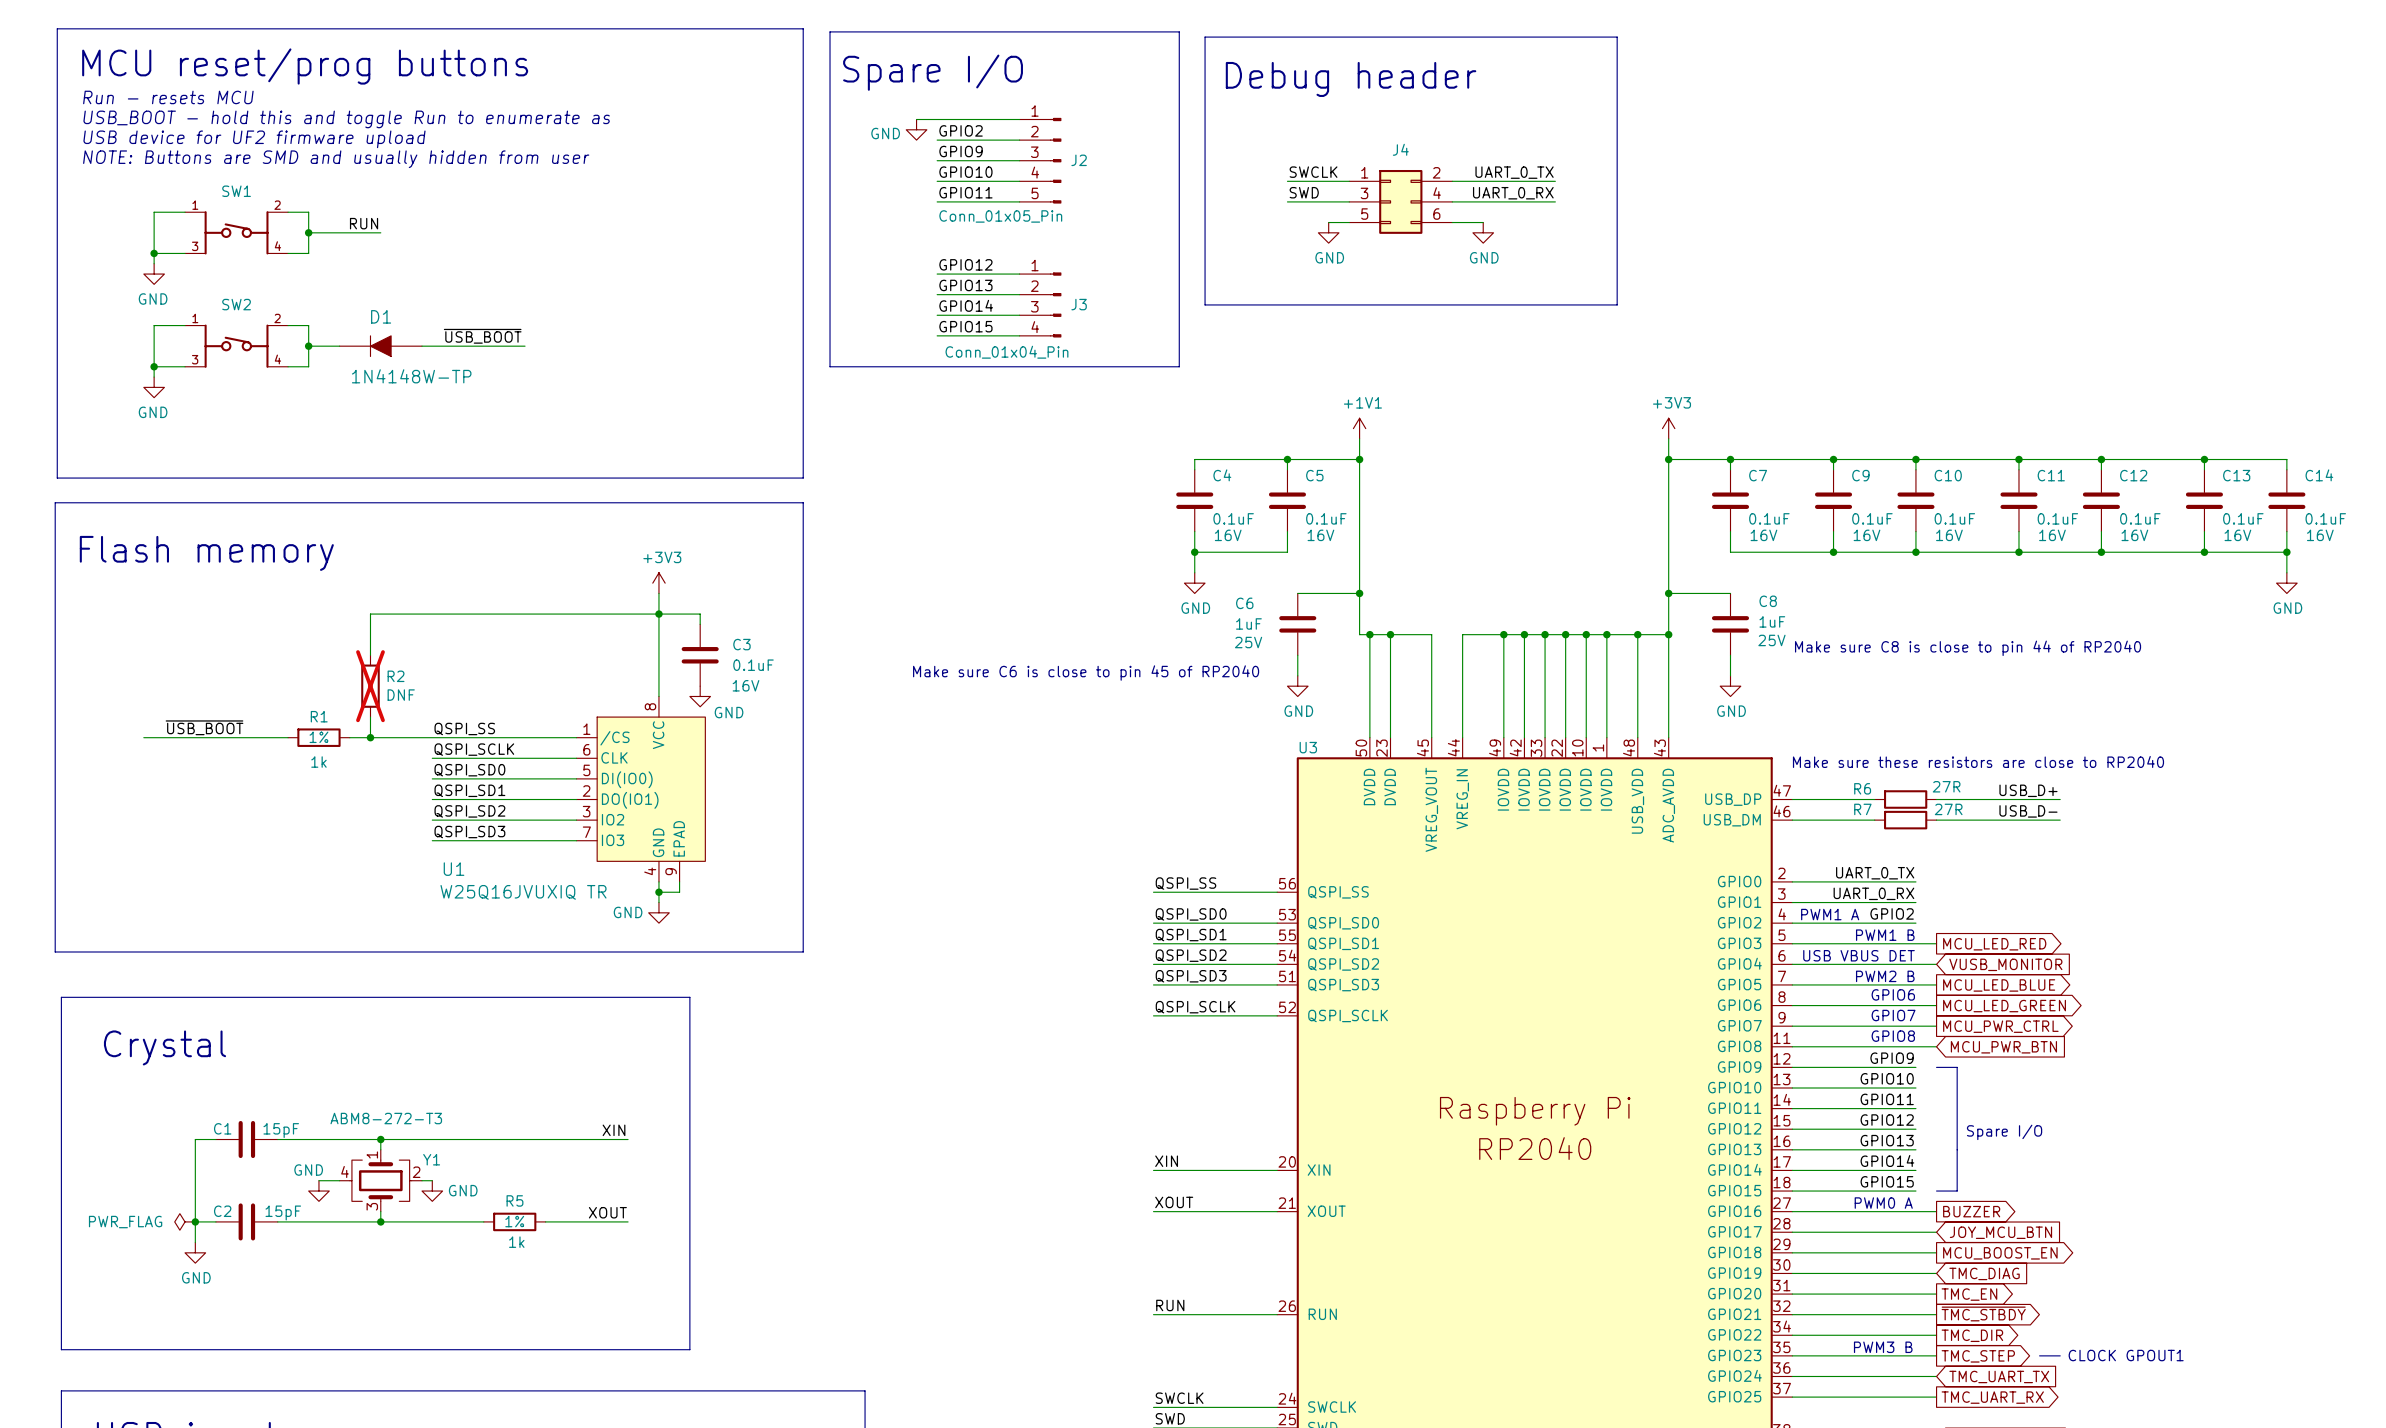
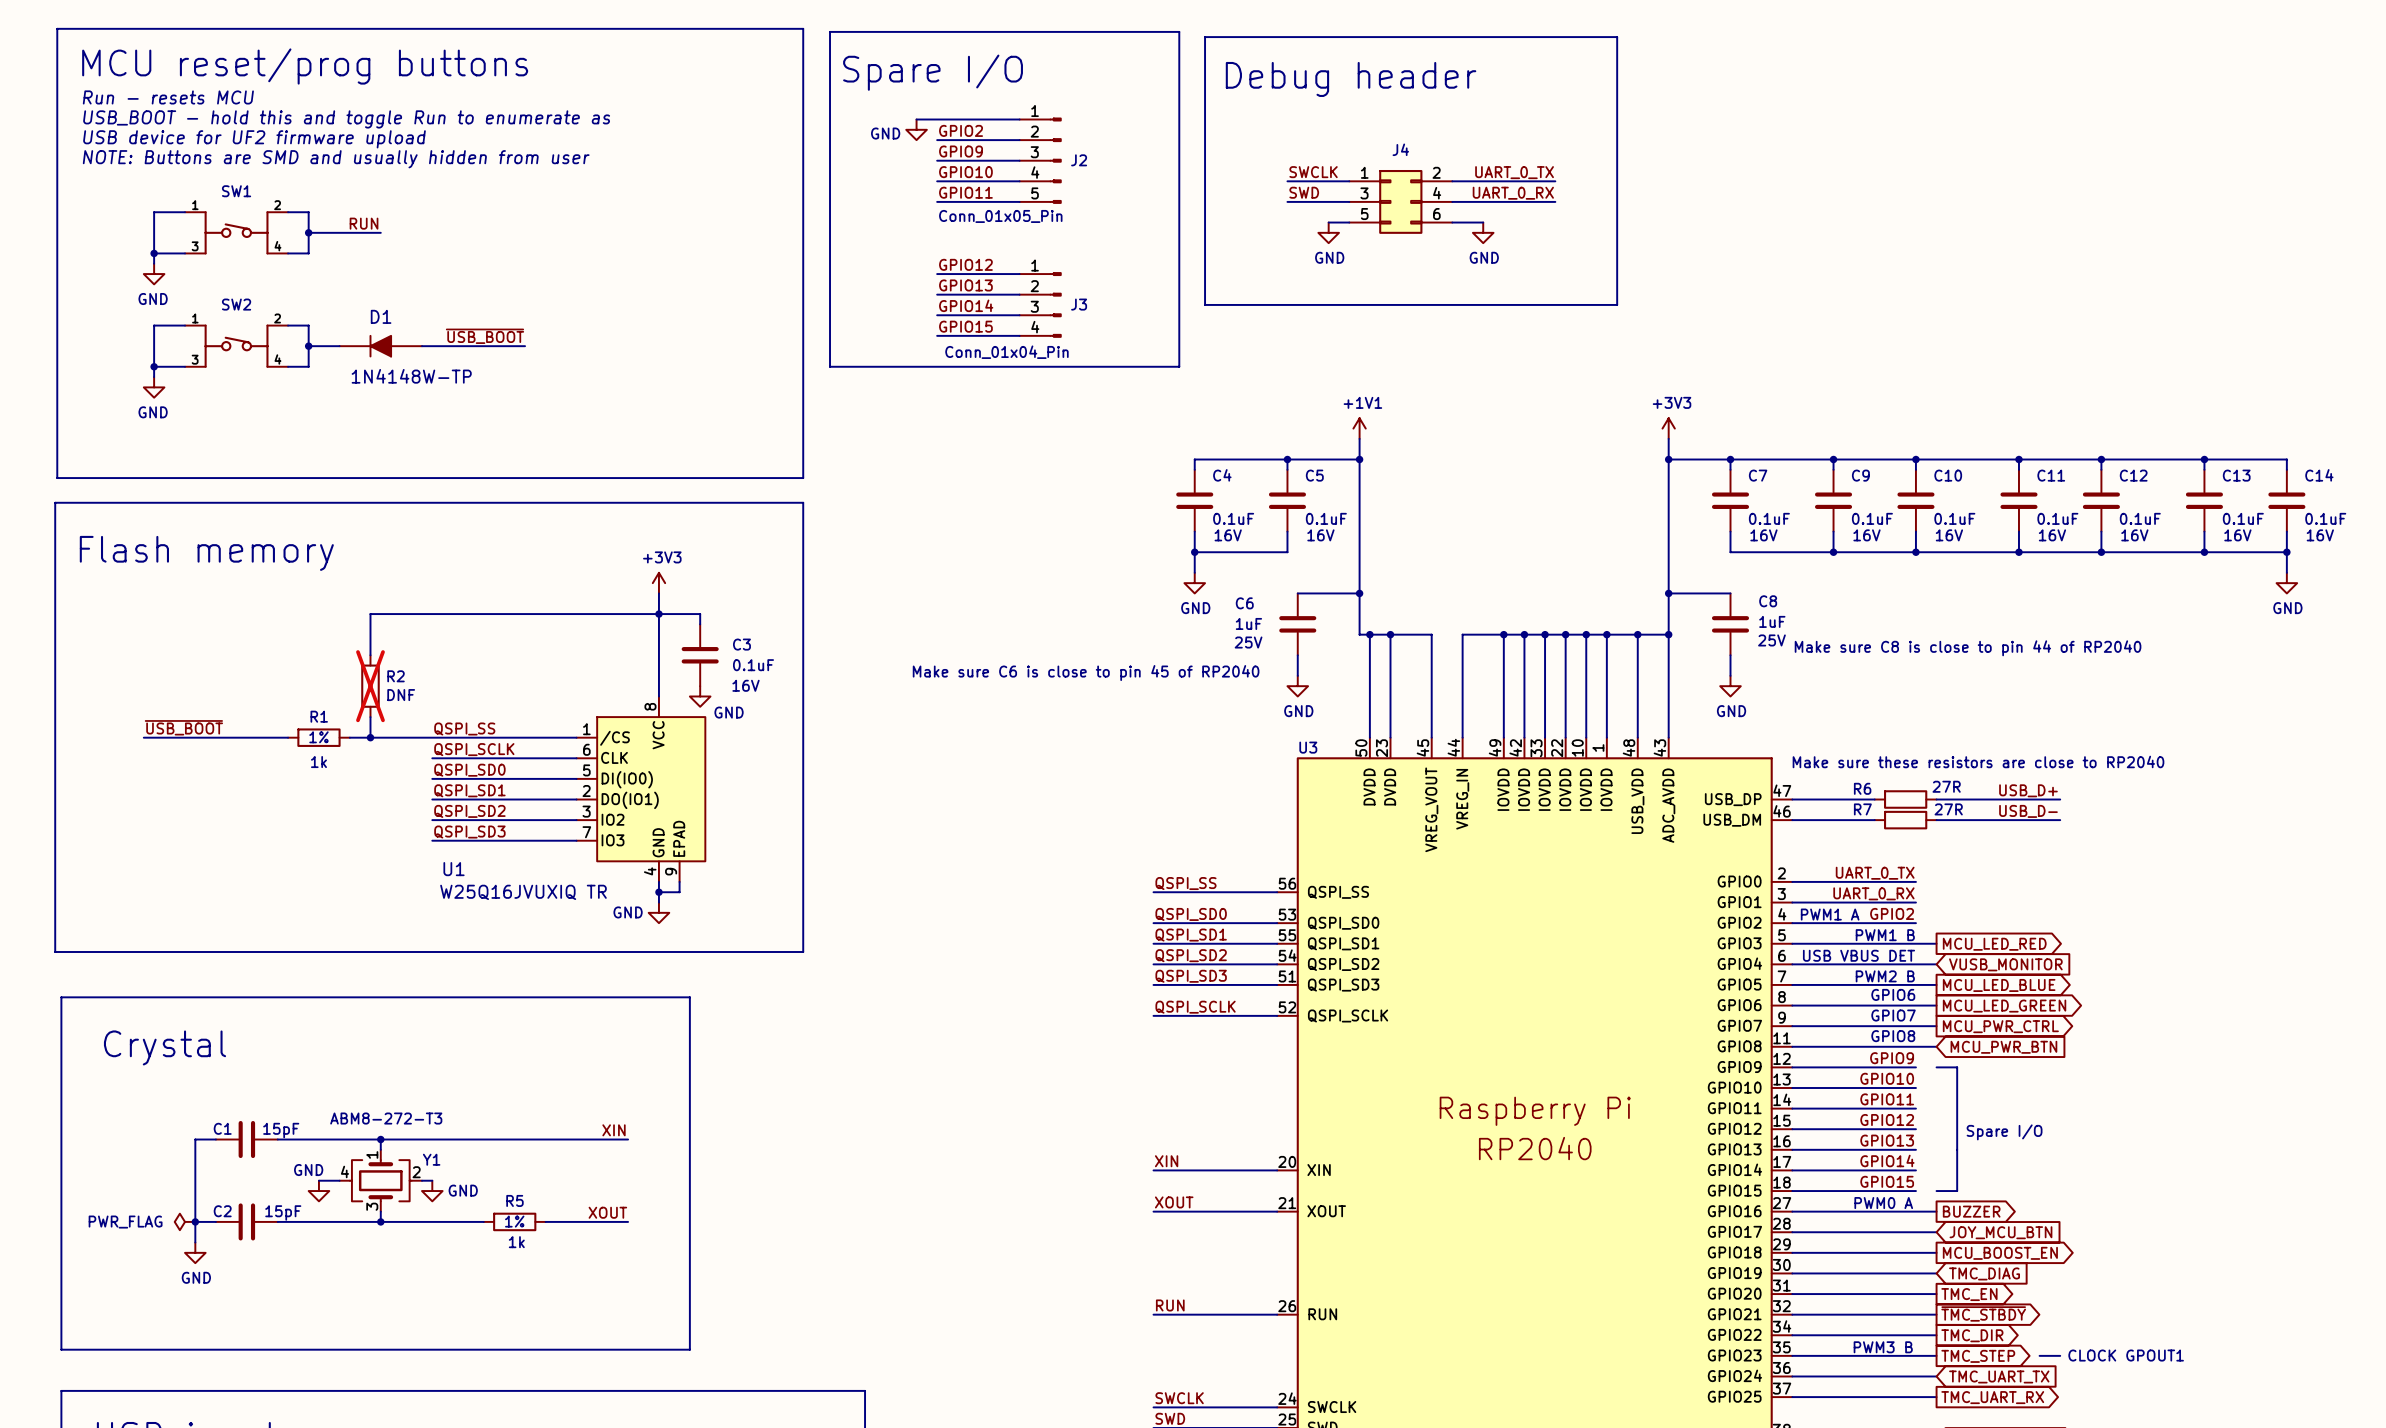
label position: ~{USB_BOOT} (482, 336) -> ~{USB_BOOT} (484, 336)
label position: ~{USB_BOOT} (204, 727) -> ~{USB_BOOT} (183, 727)

